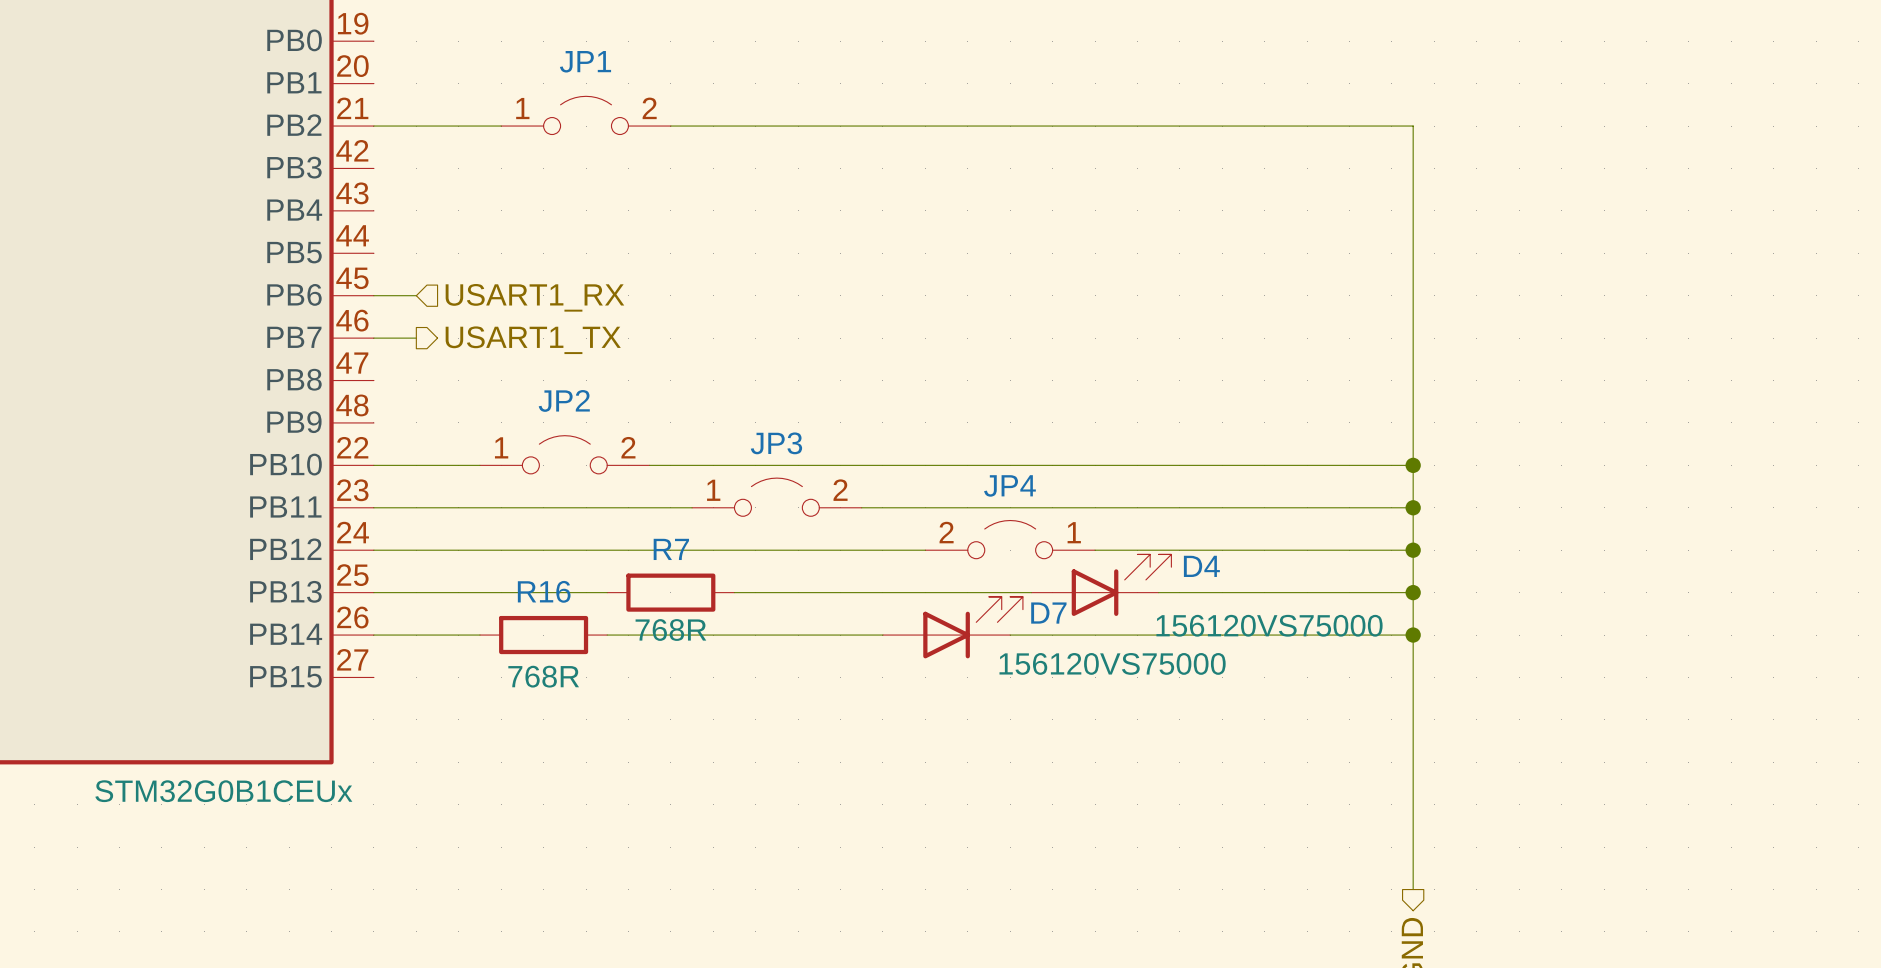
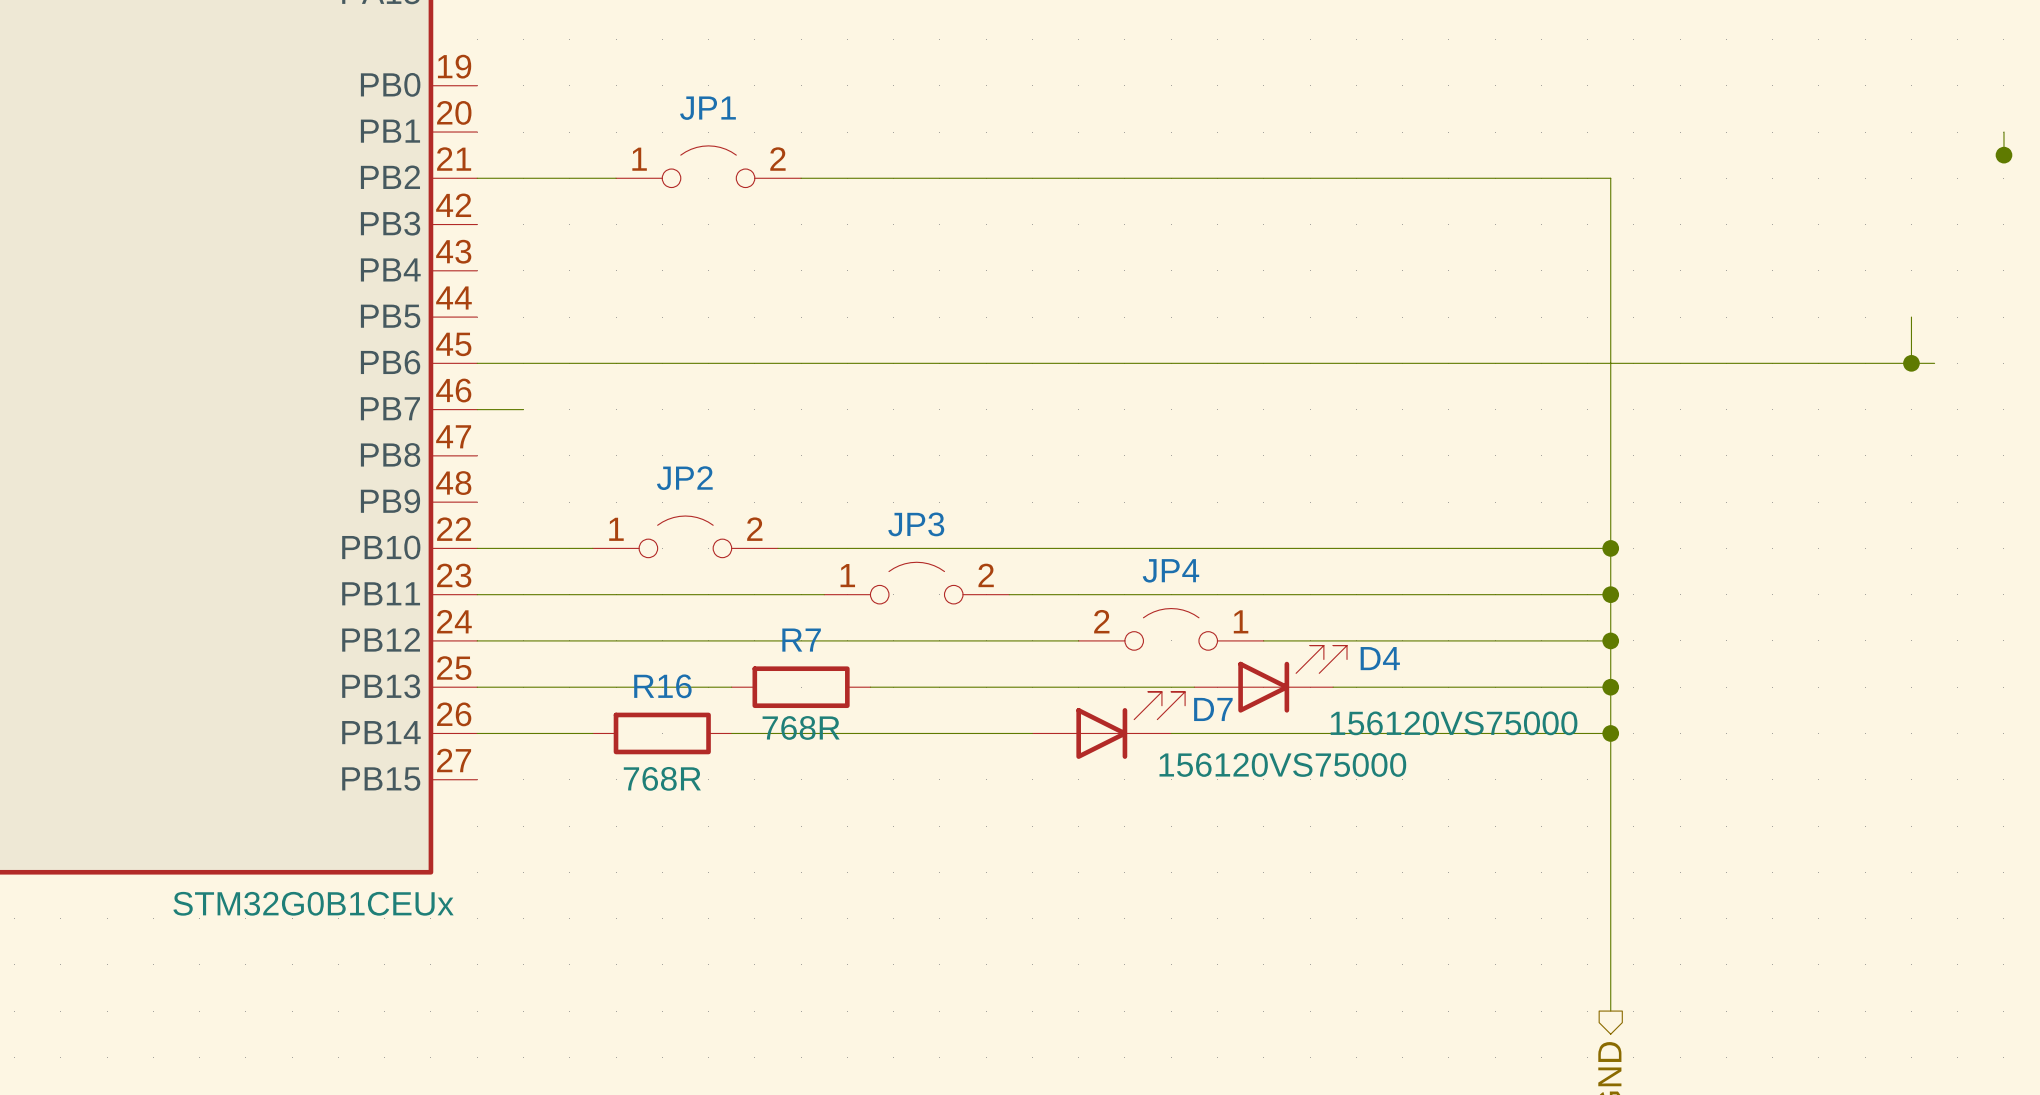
wire: none -> (2003, 132) (2003, 155)
junction: none -> (2003, 155)
wire: none -> (1911, 317) (1911, 363)
wire: none -> (523, 363) (1934, 363)
junction: none -> (1911, 363)
hierarchical label: USART1_RX (534, 297) -> none
hierarchical label: USART1_TX (533, 340) -> none

